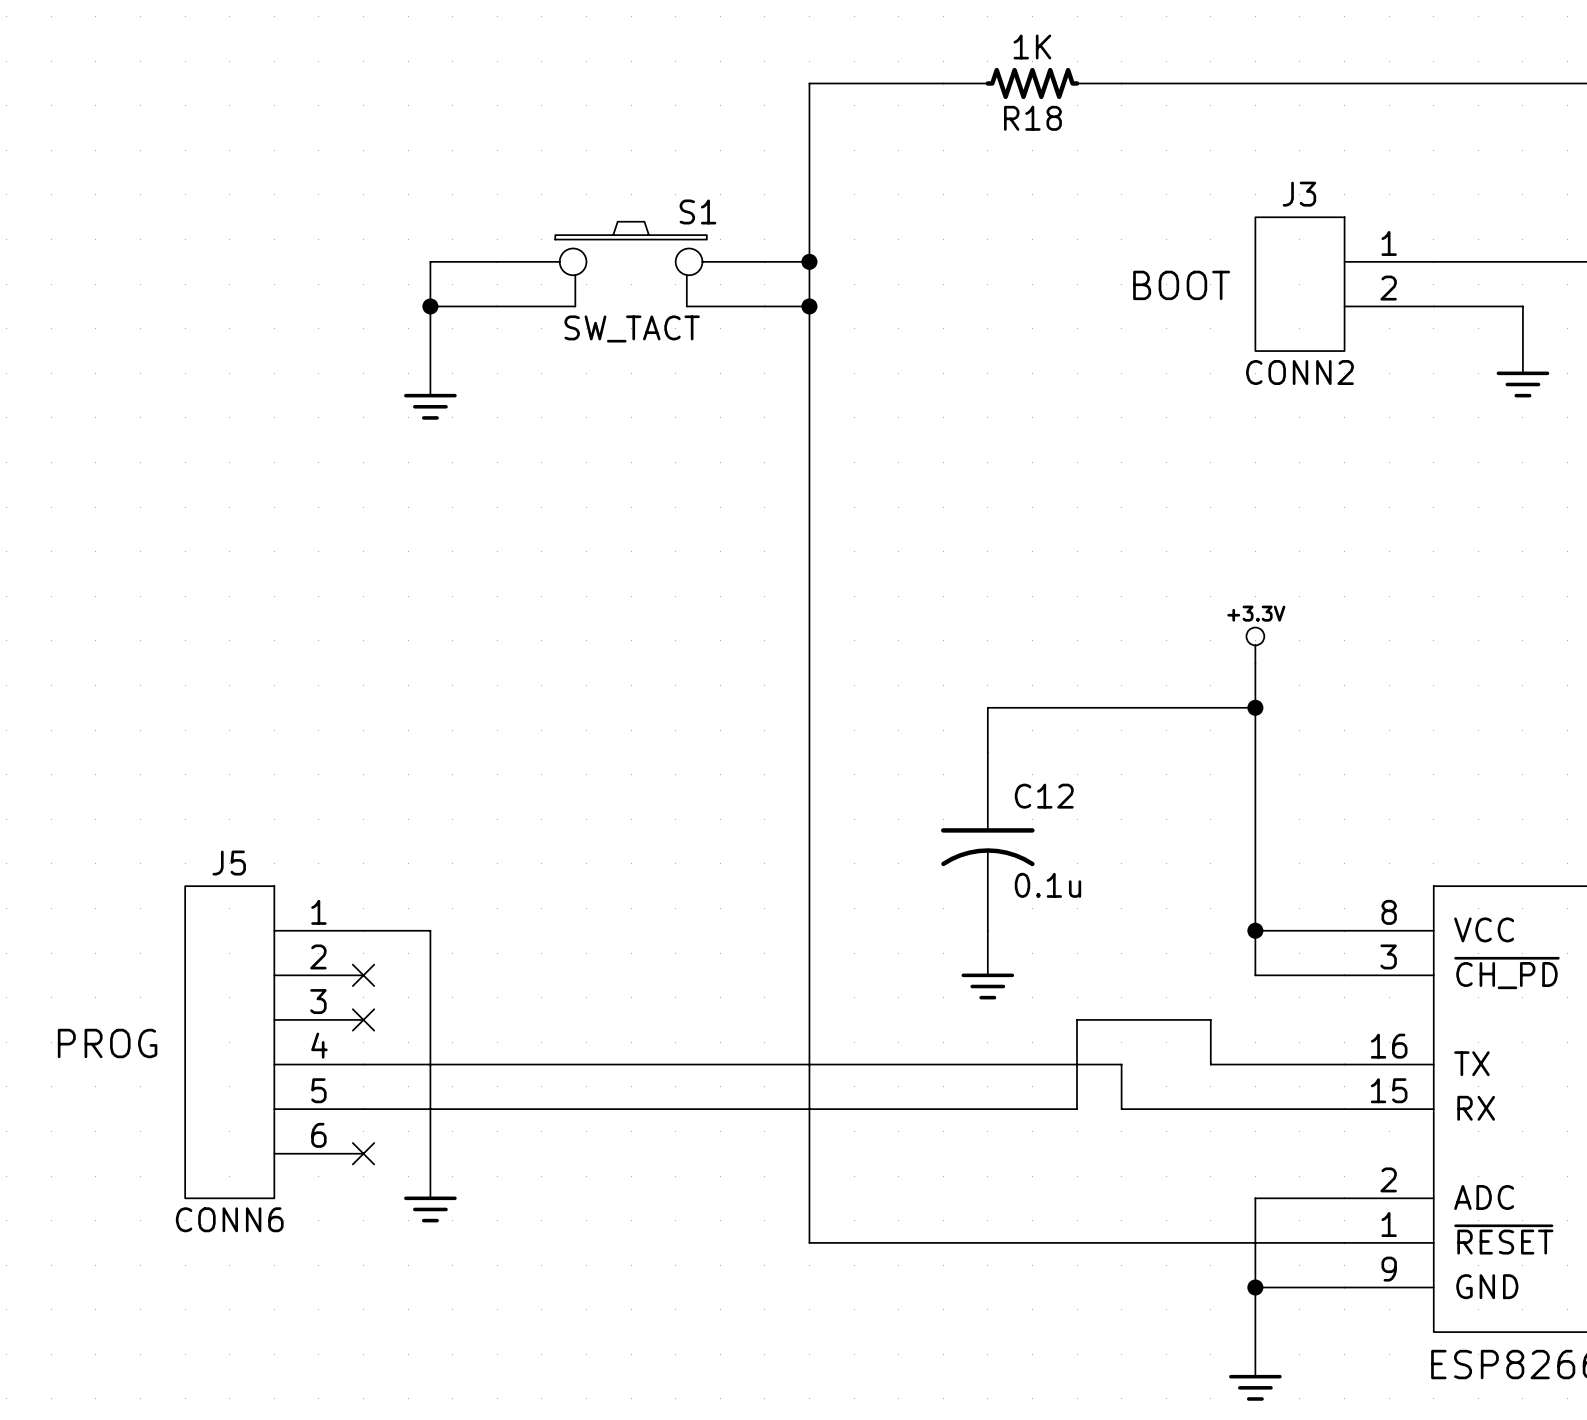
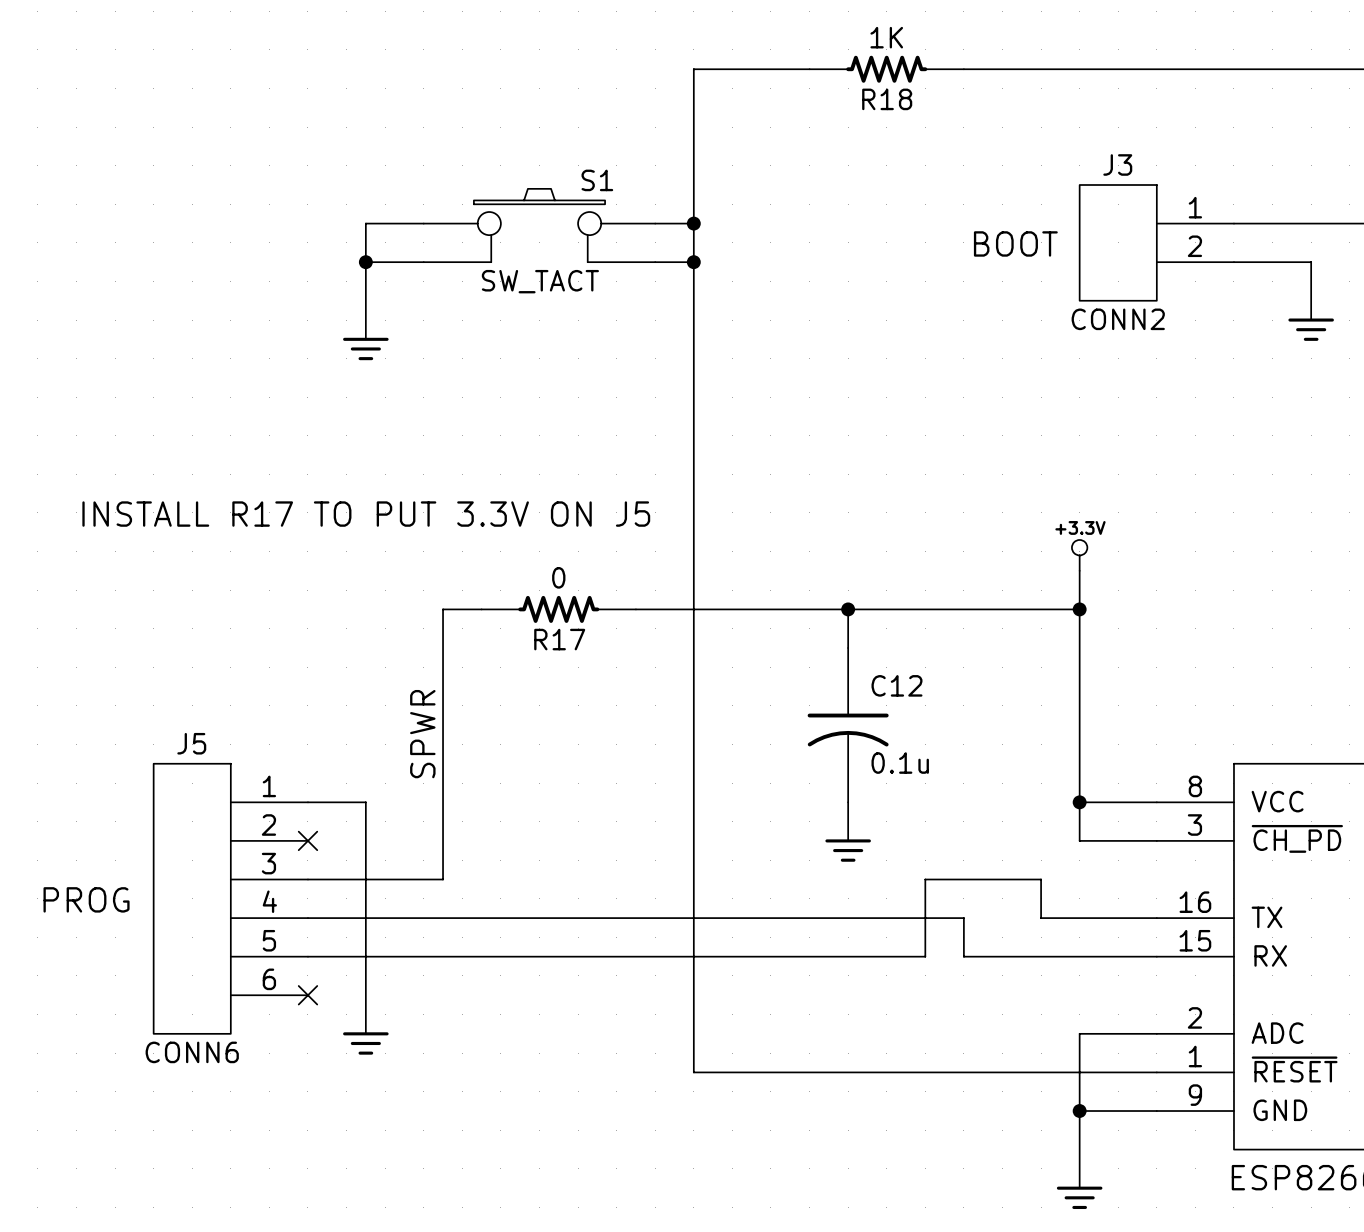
text: none -> INSTALL R17 TO PUT 3.3V ON J5 (366, 514)
wire: none -> (481, 609) (443, 609) (443, 879) (307, 879)
R17: none -> 0 (558, 609)
wire: none -> (635, 609) (848, 609)
junction: none -> (848, 609)
label: none -> SPWR (422, 734)
no-connect mark: (363, 1019) -> none

